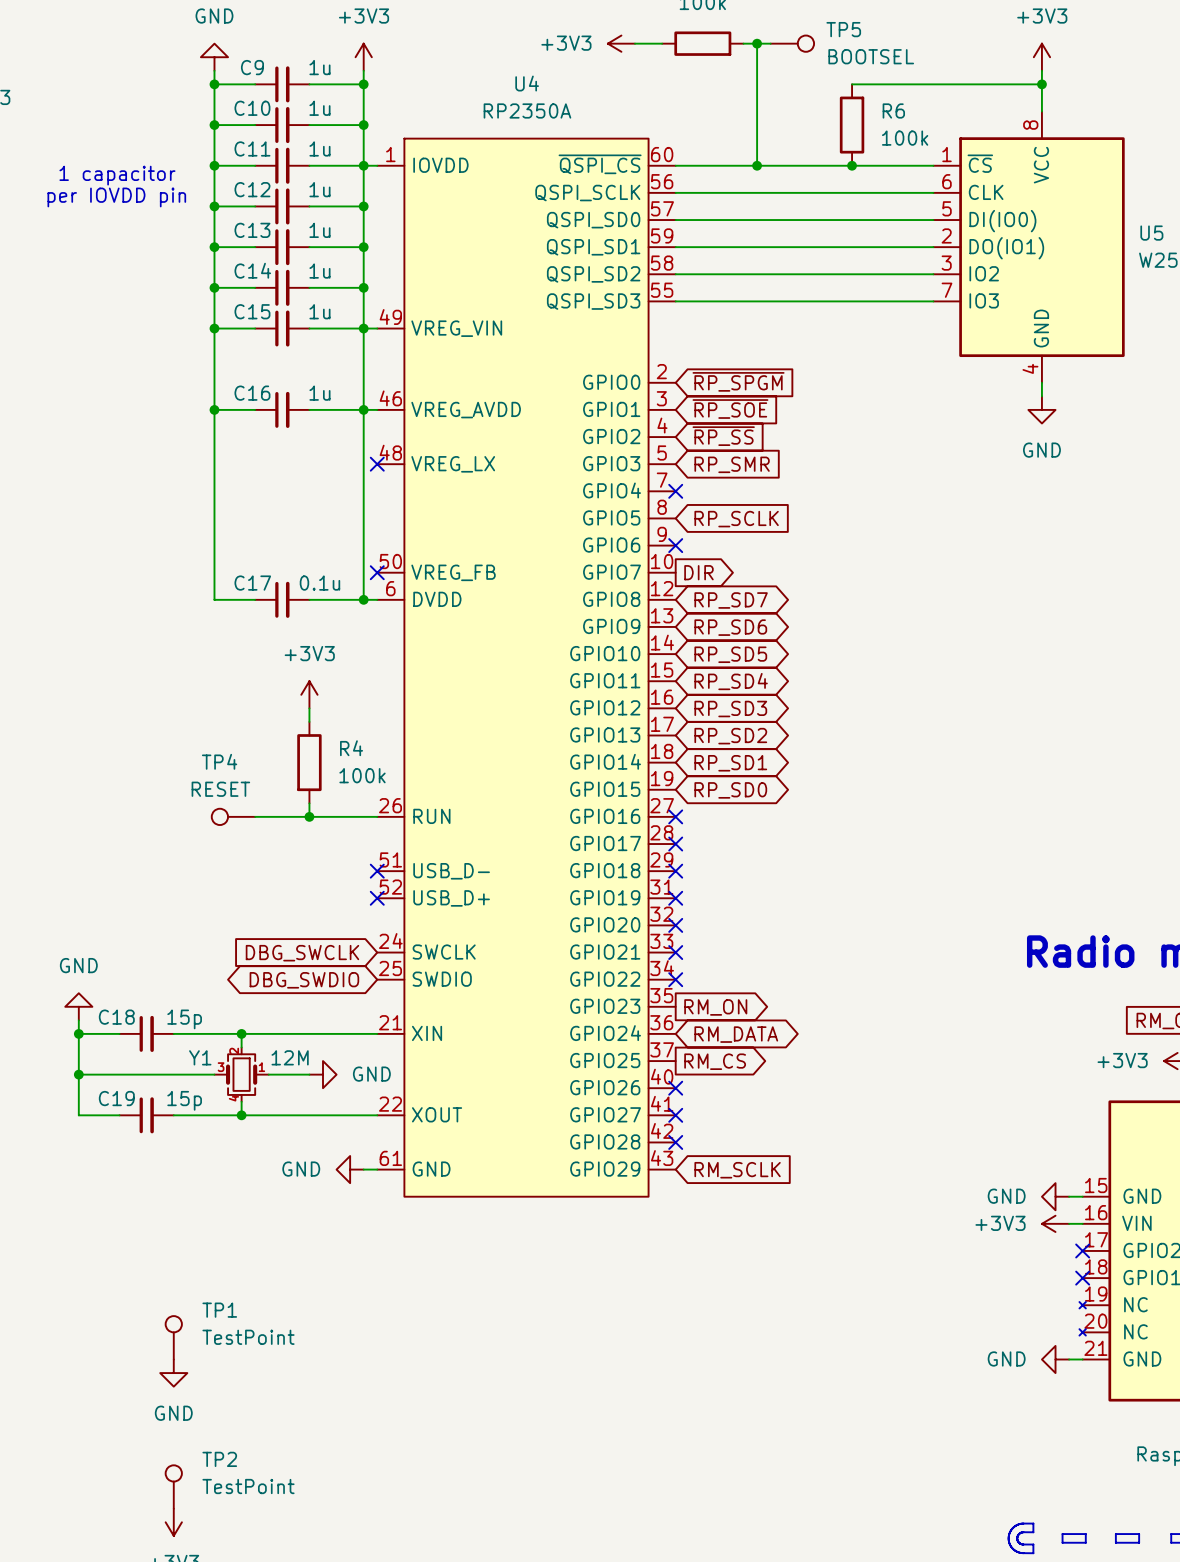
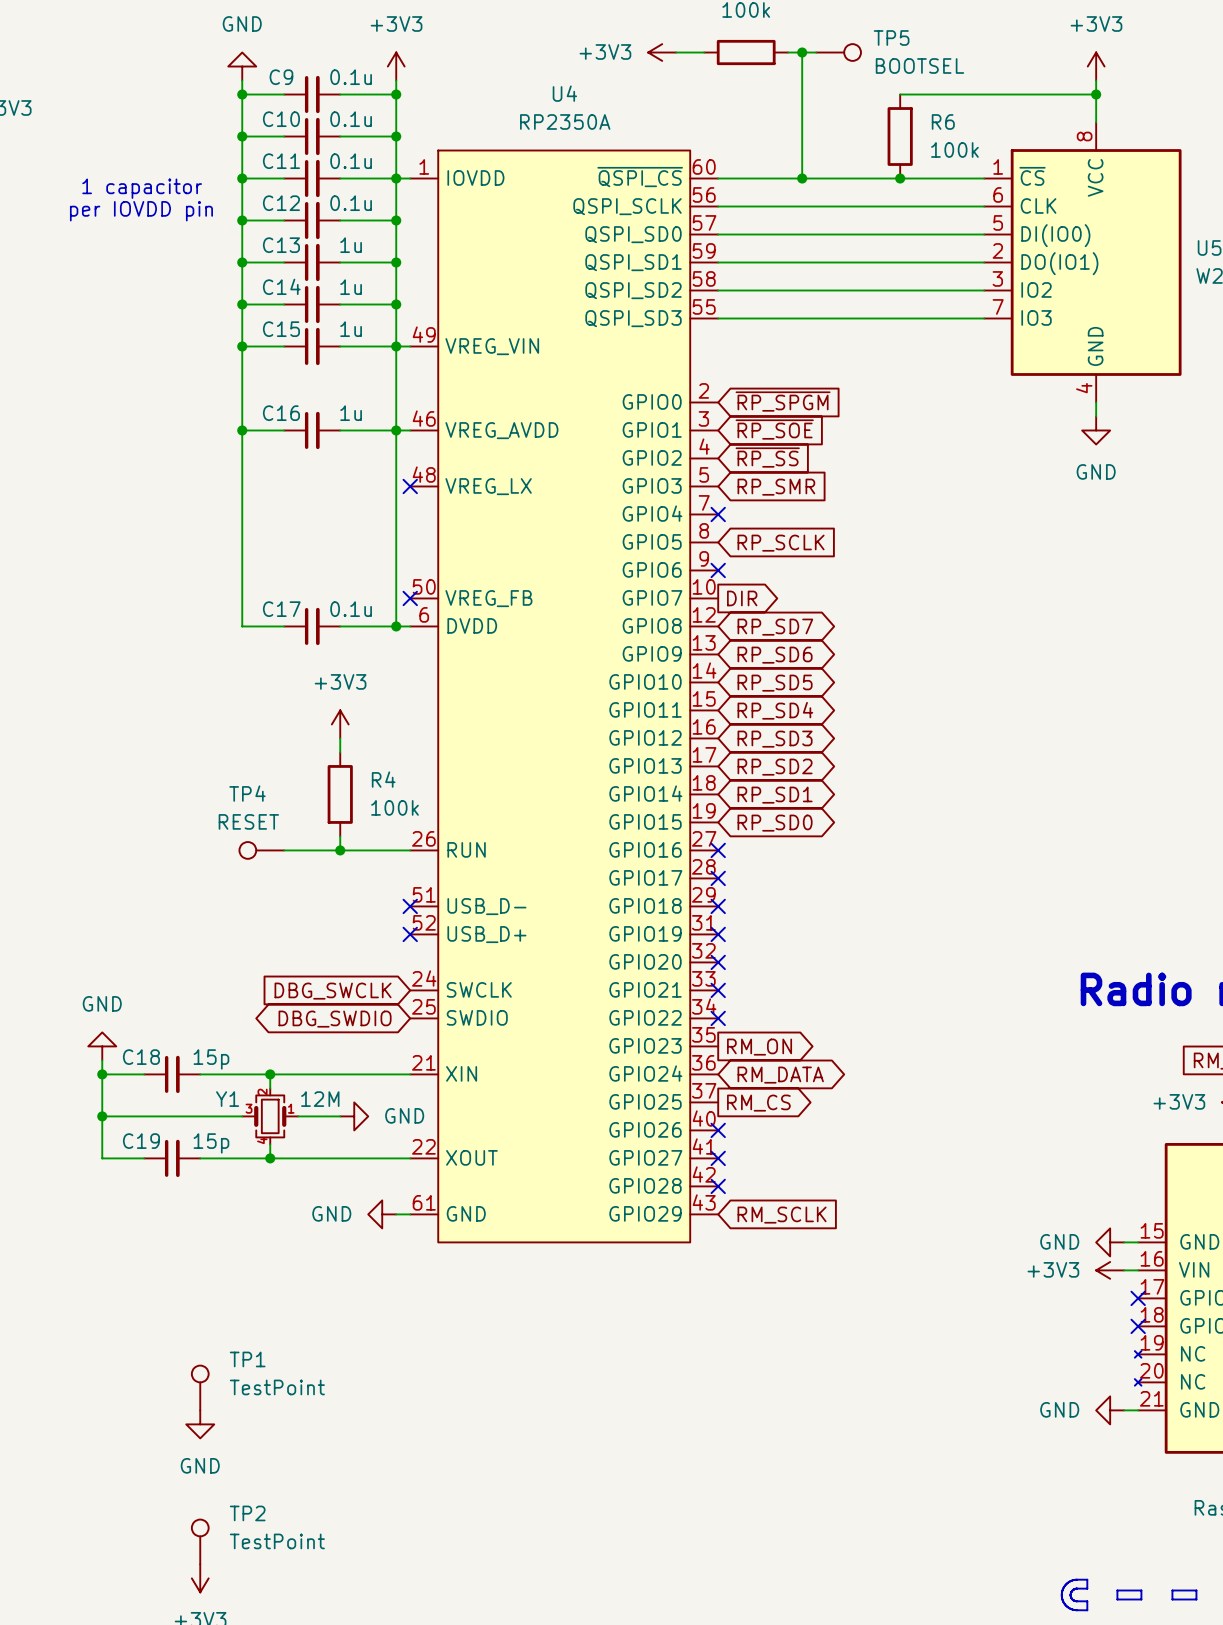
C9 value: 1u (319, 67) -> 0.1u (351, 77)
C10 value: 1u (319, 108) -> 0.1u (351, 119)
C11 value: 1u (319, 148) -> 0.1u (351, 161)
C12 value: 1u (319, 189) -> 0.1u (351, 203)

